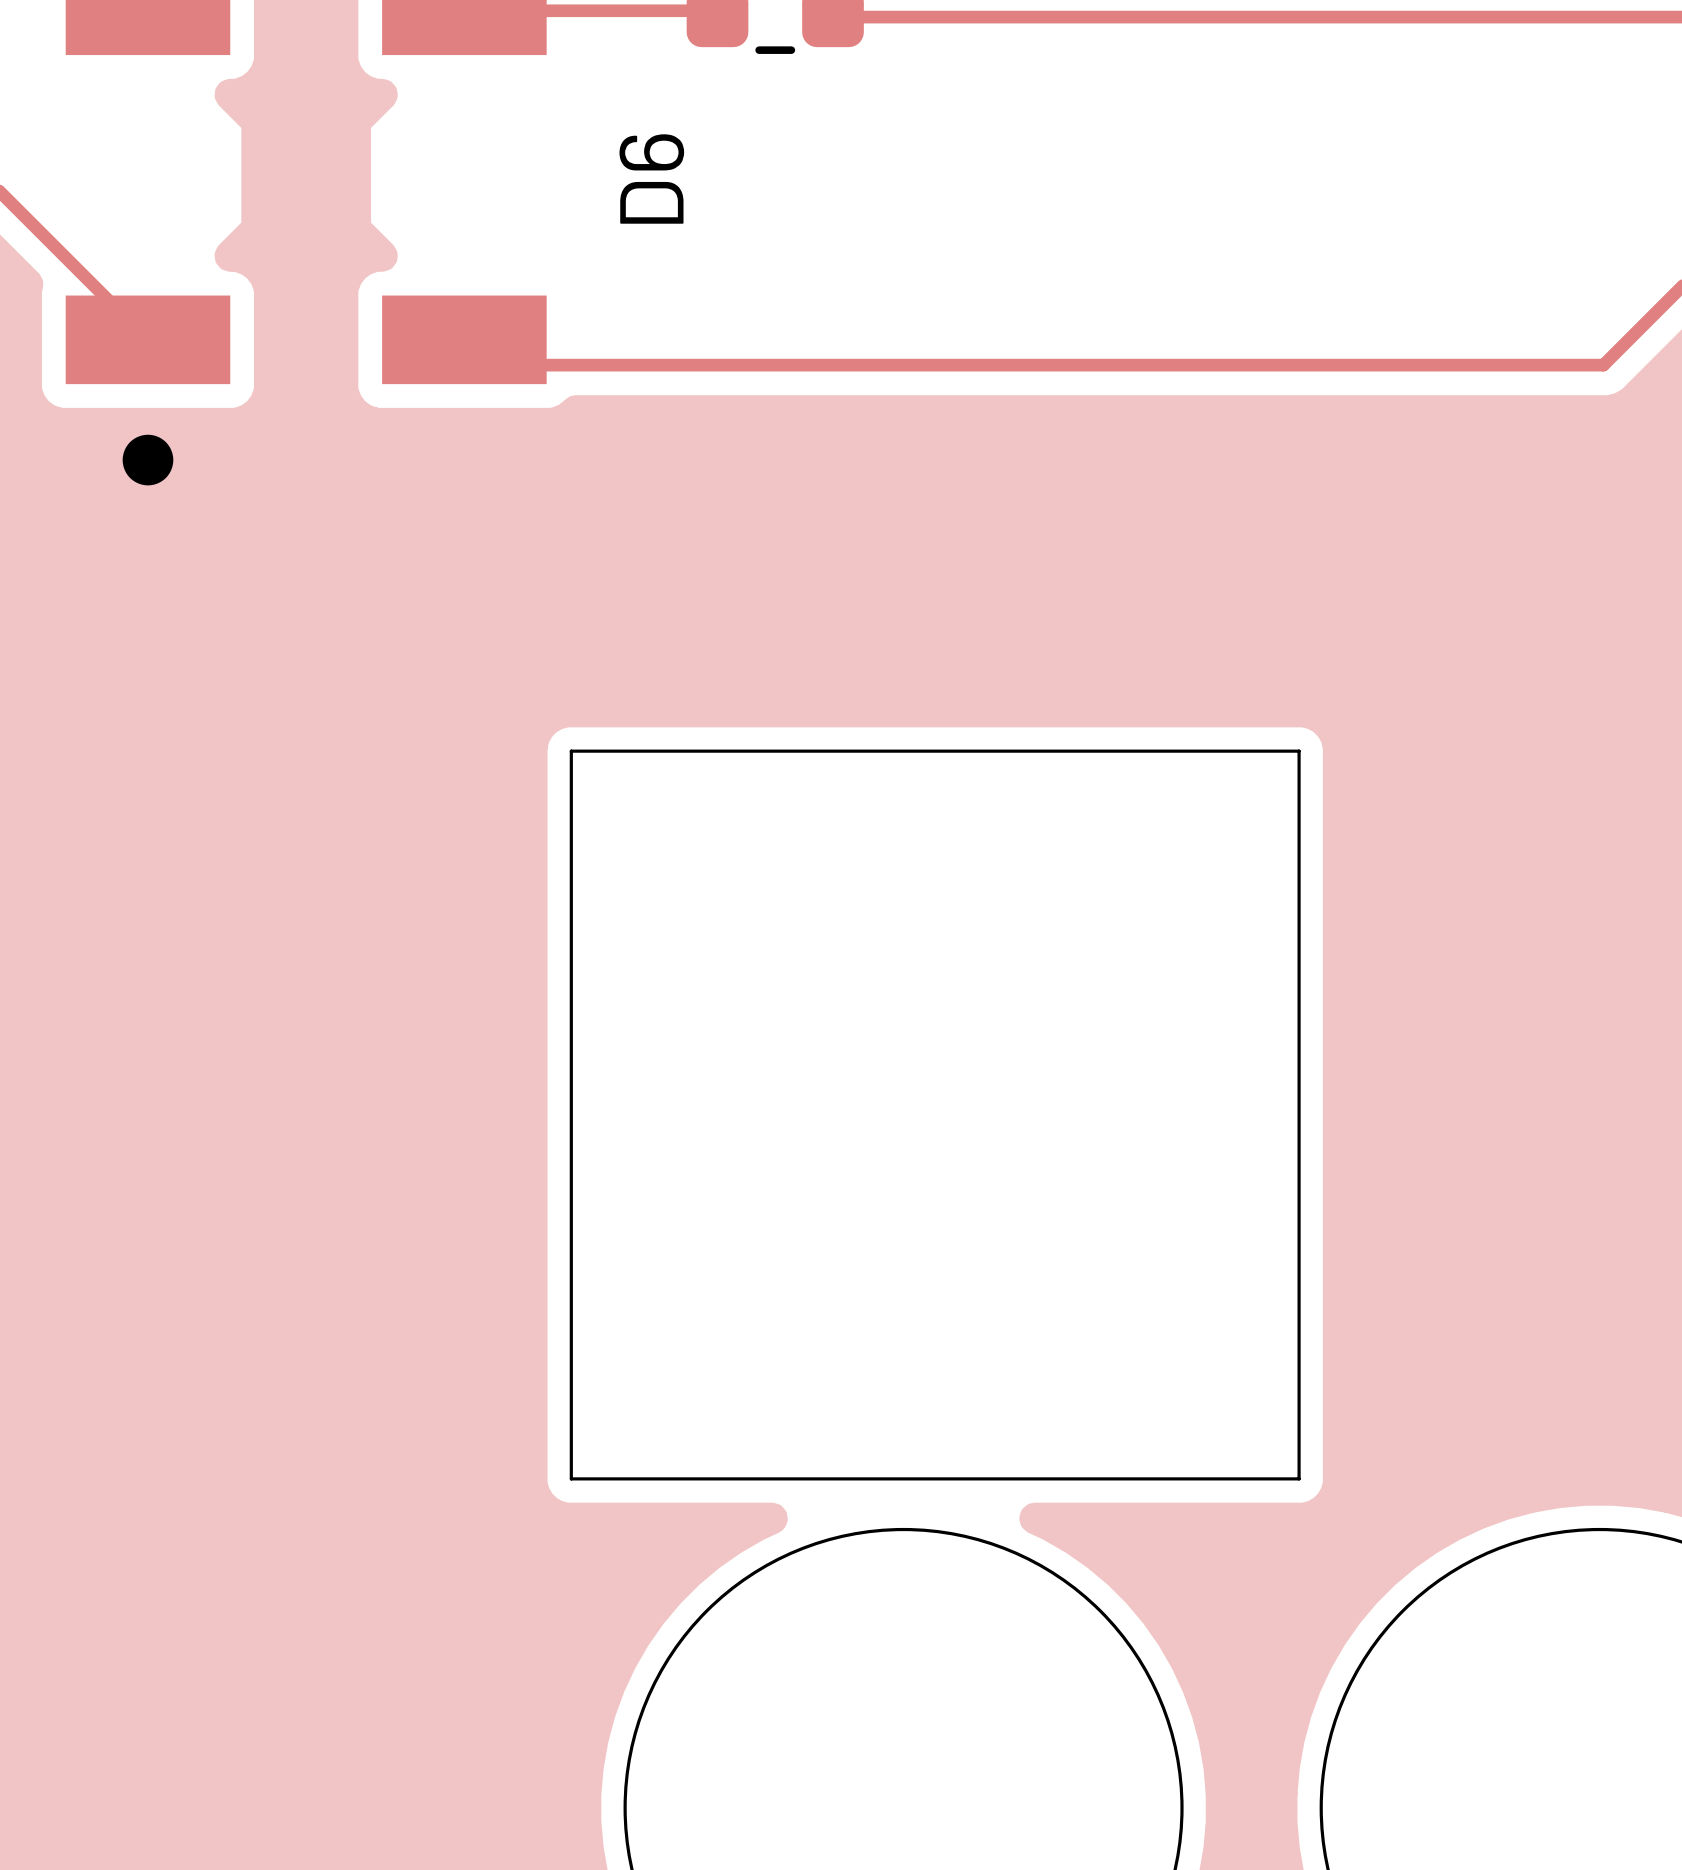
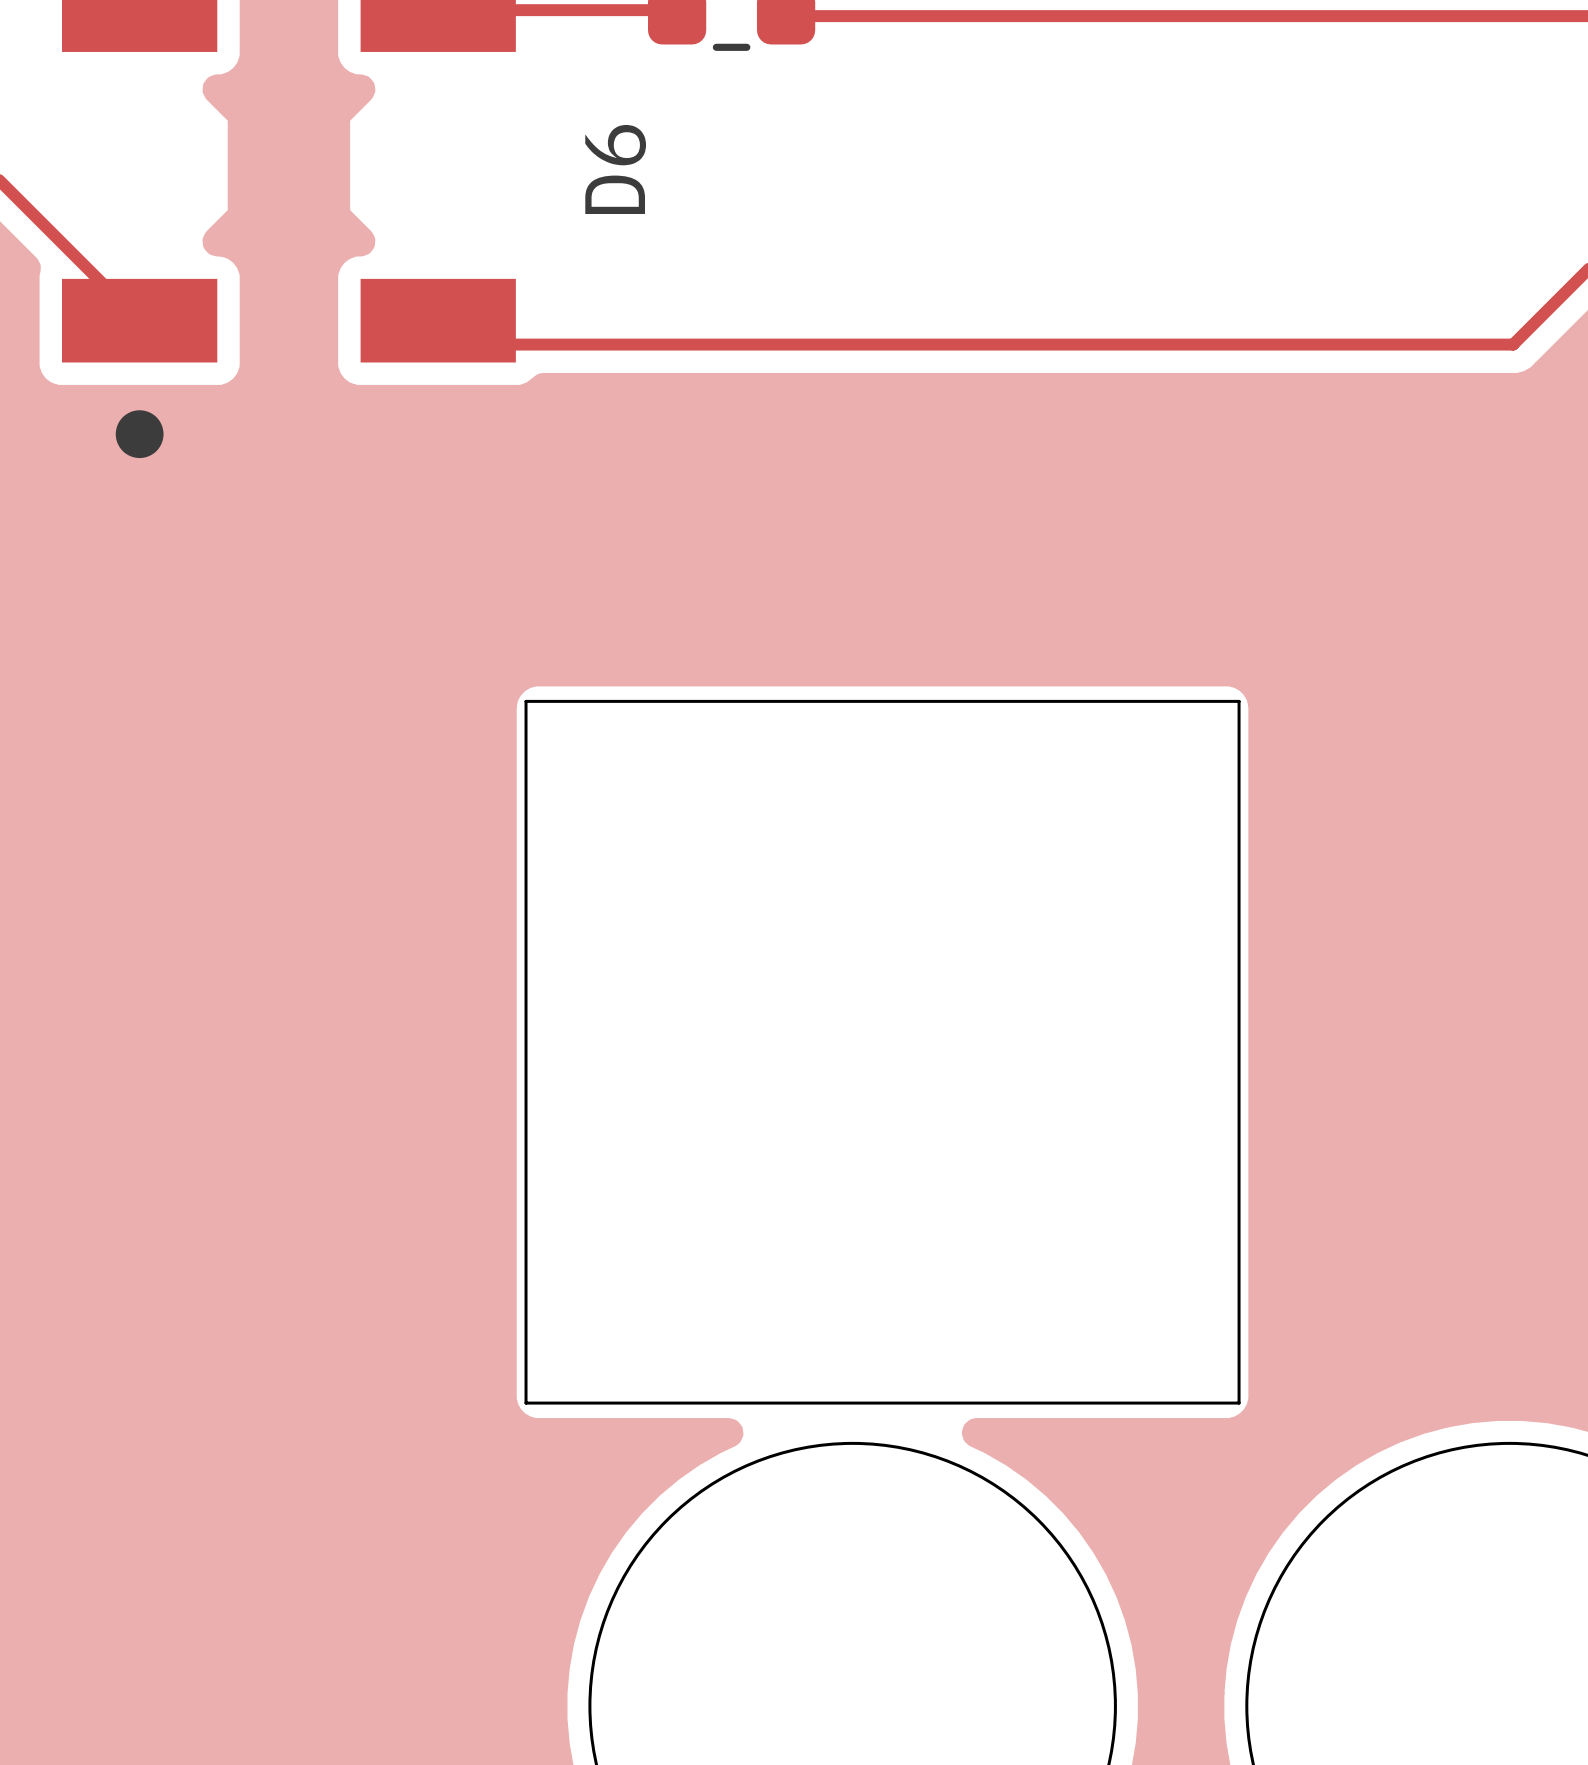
board edge: (571, 751) (1299, 751) (1299, 1478) (571, 1478) (571, 751) -> (526, 701) (526, 1403) (1239, 1403) (1239, 701) (526, 701)

